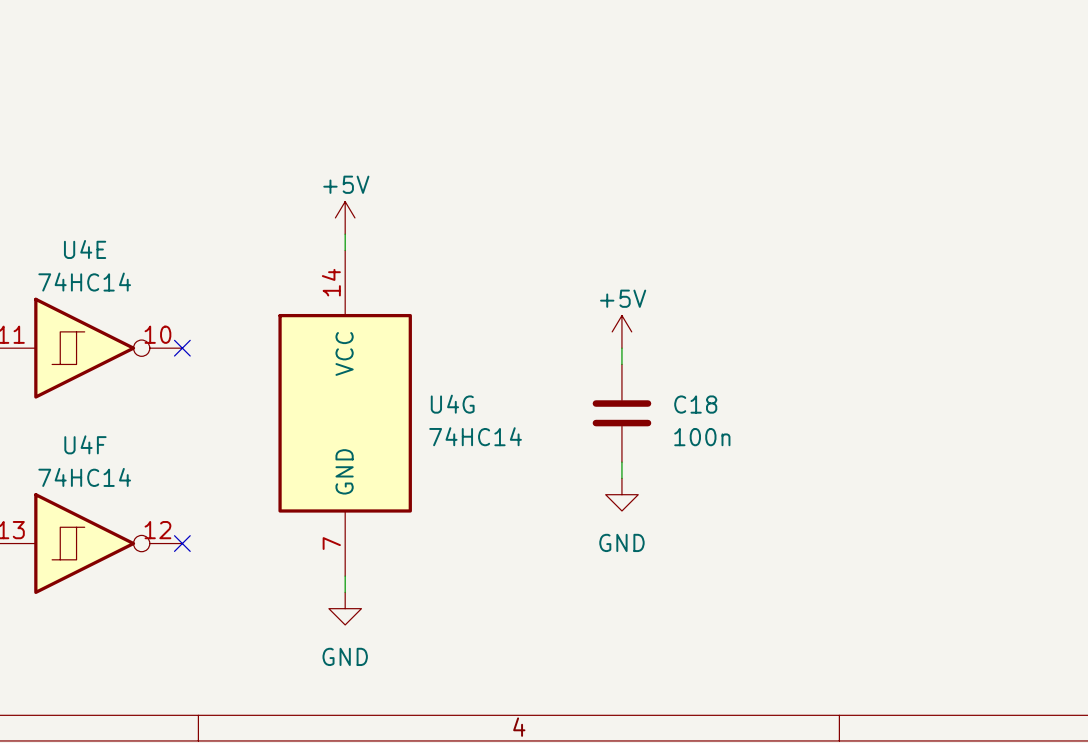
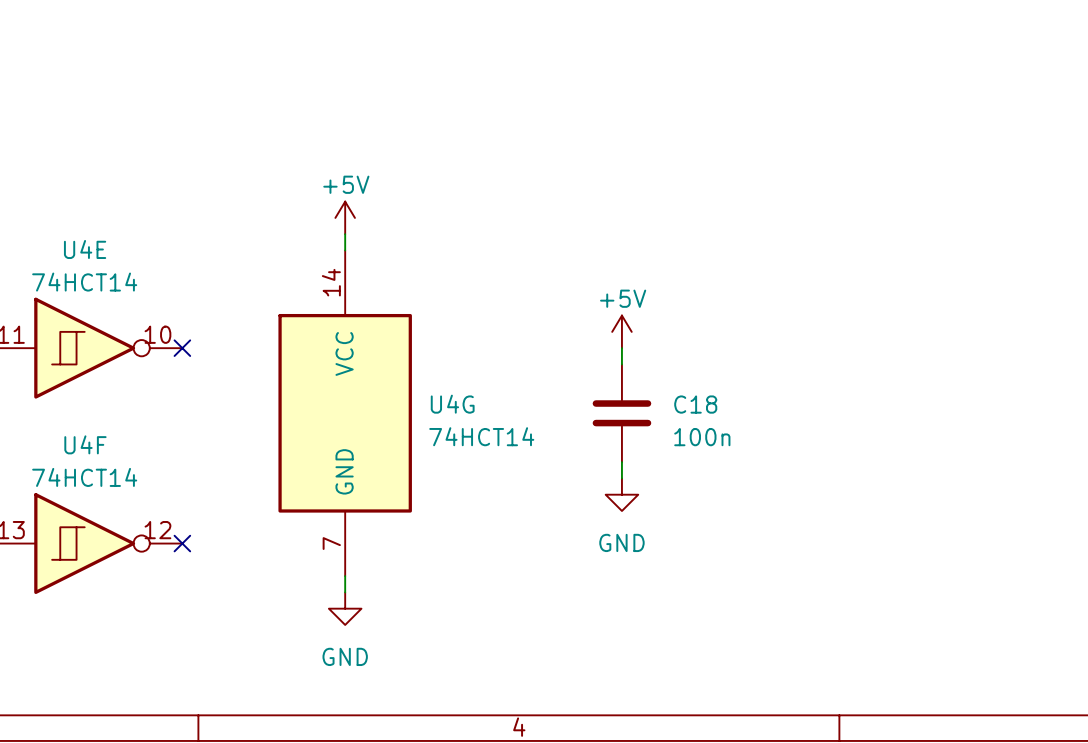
U4E value: 74HC14 (84, 282) -> 74HCT14 (84, 282)
U4G value: 74HC14 (475, 436) -> 74HCT14 (481, 436)
U4F value: 74HC14 (84, 477) -> 74HCT14 (84, 477)

